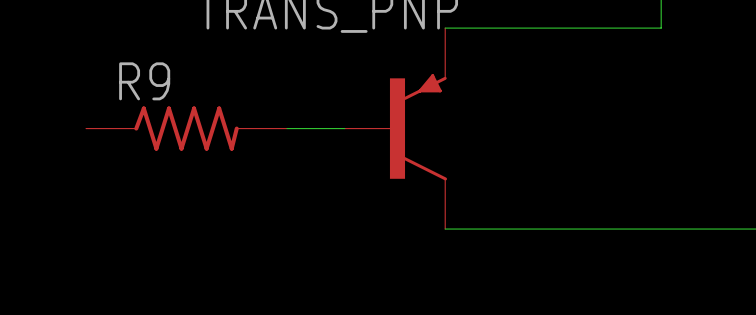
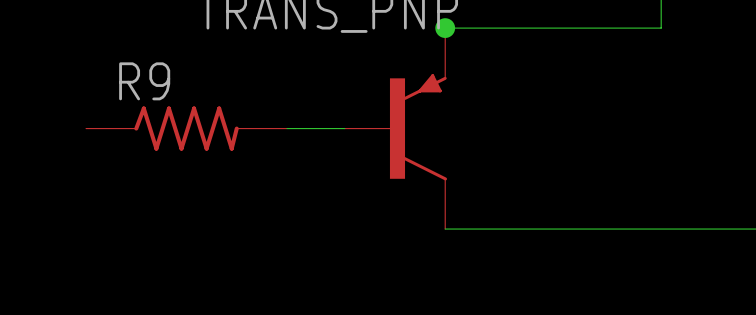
junction: none -> (445, 28)

